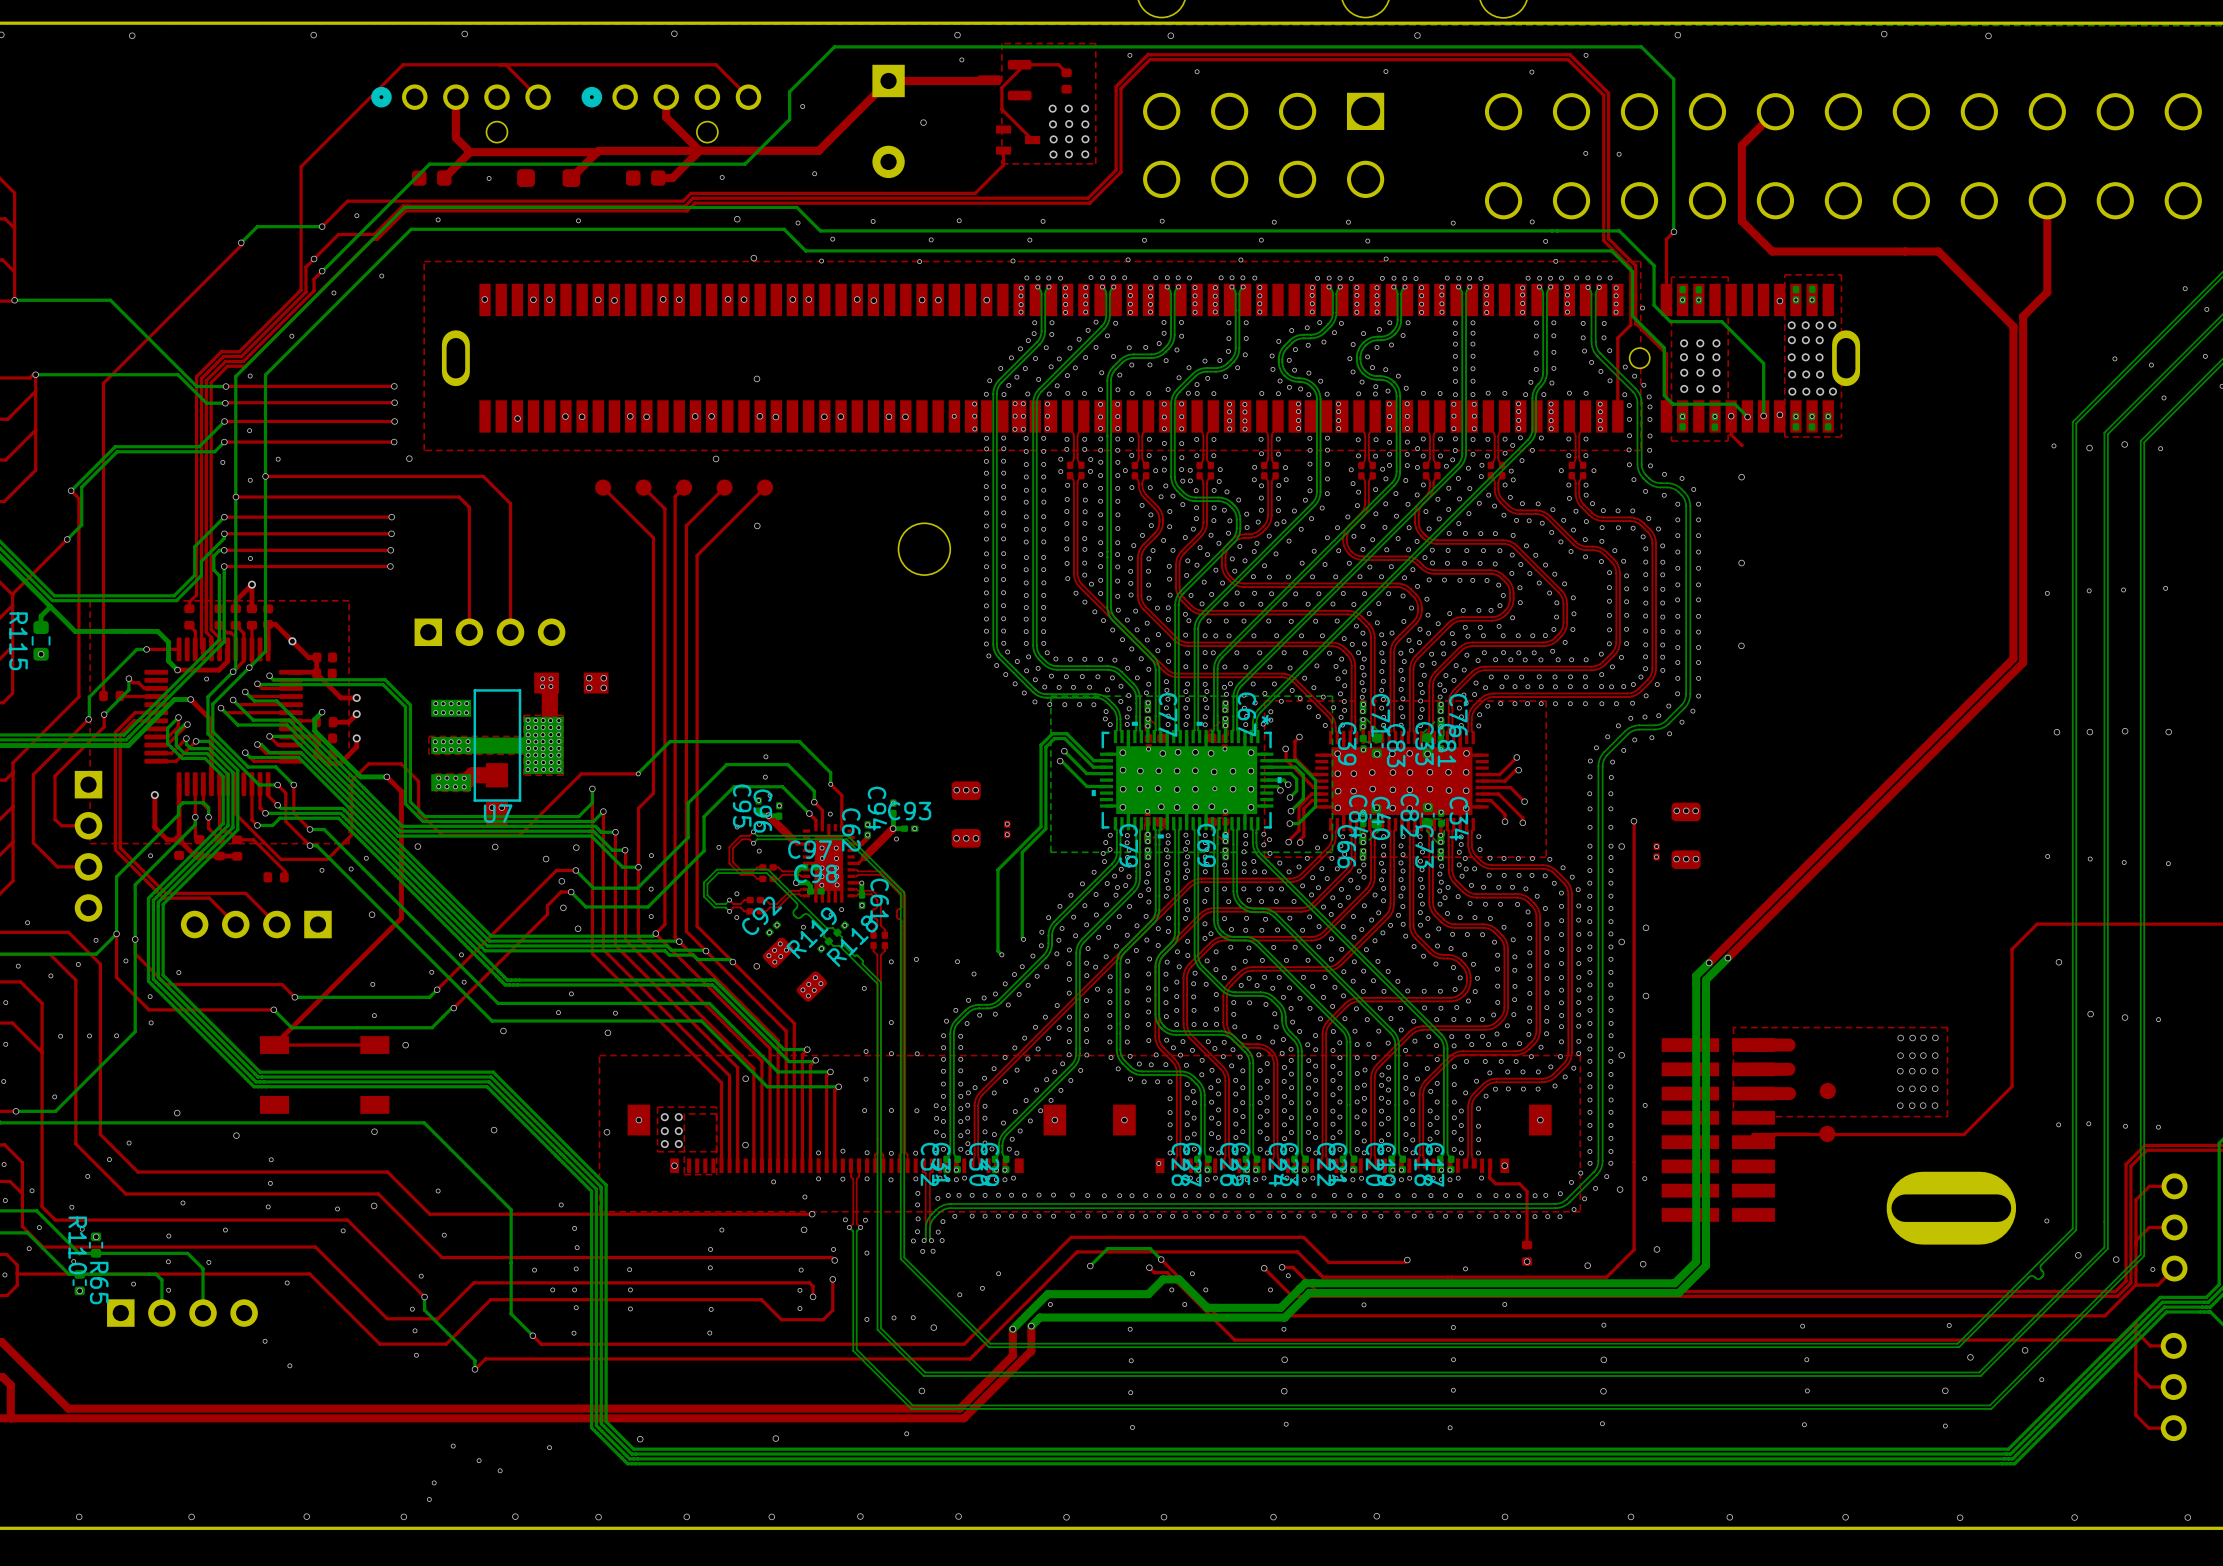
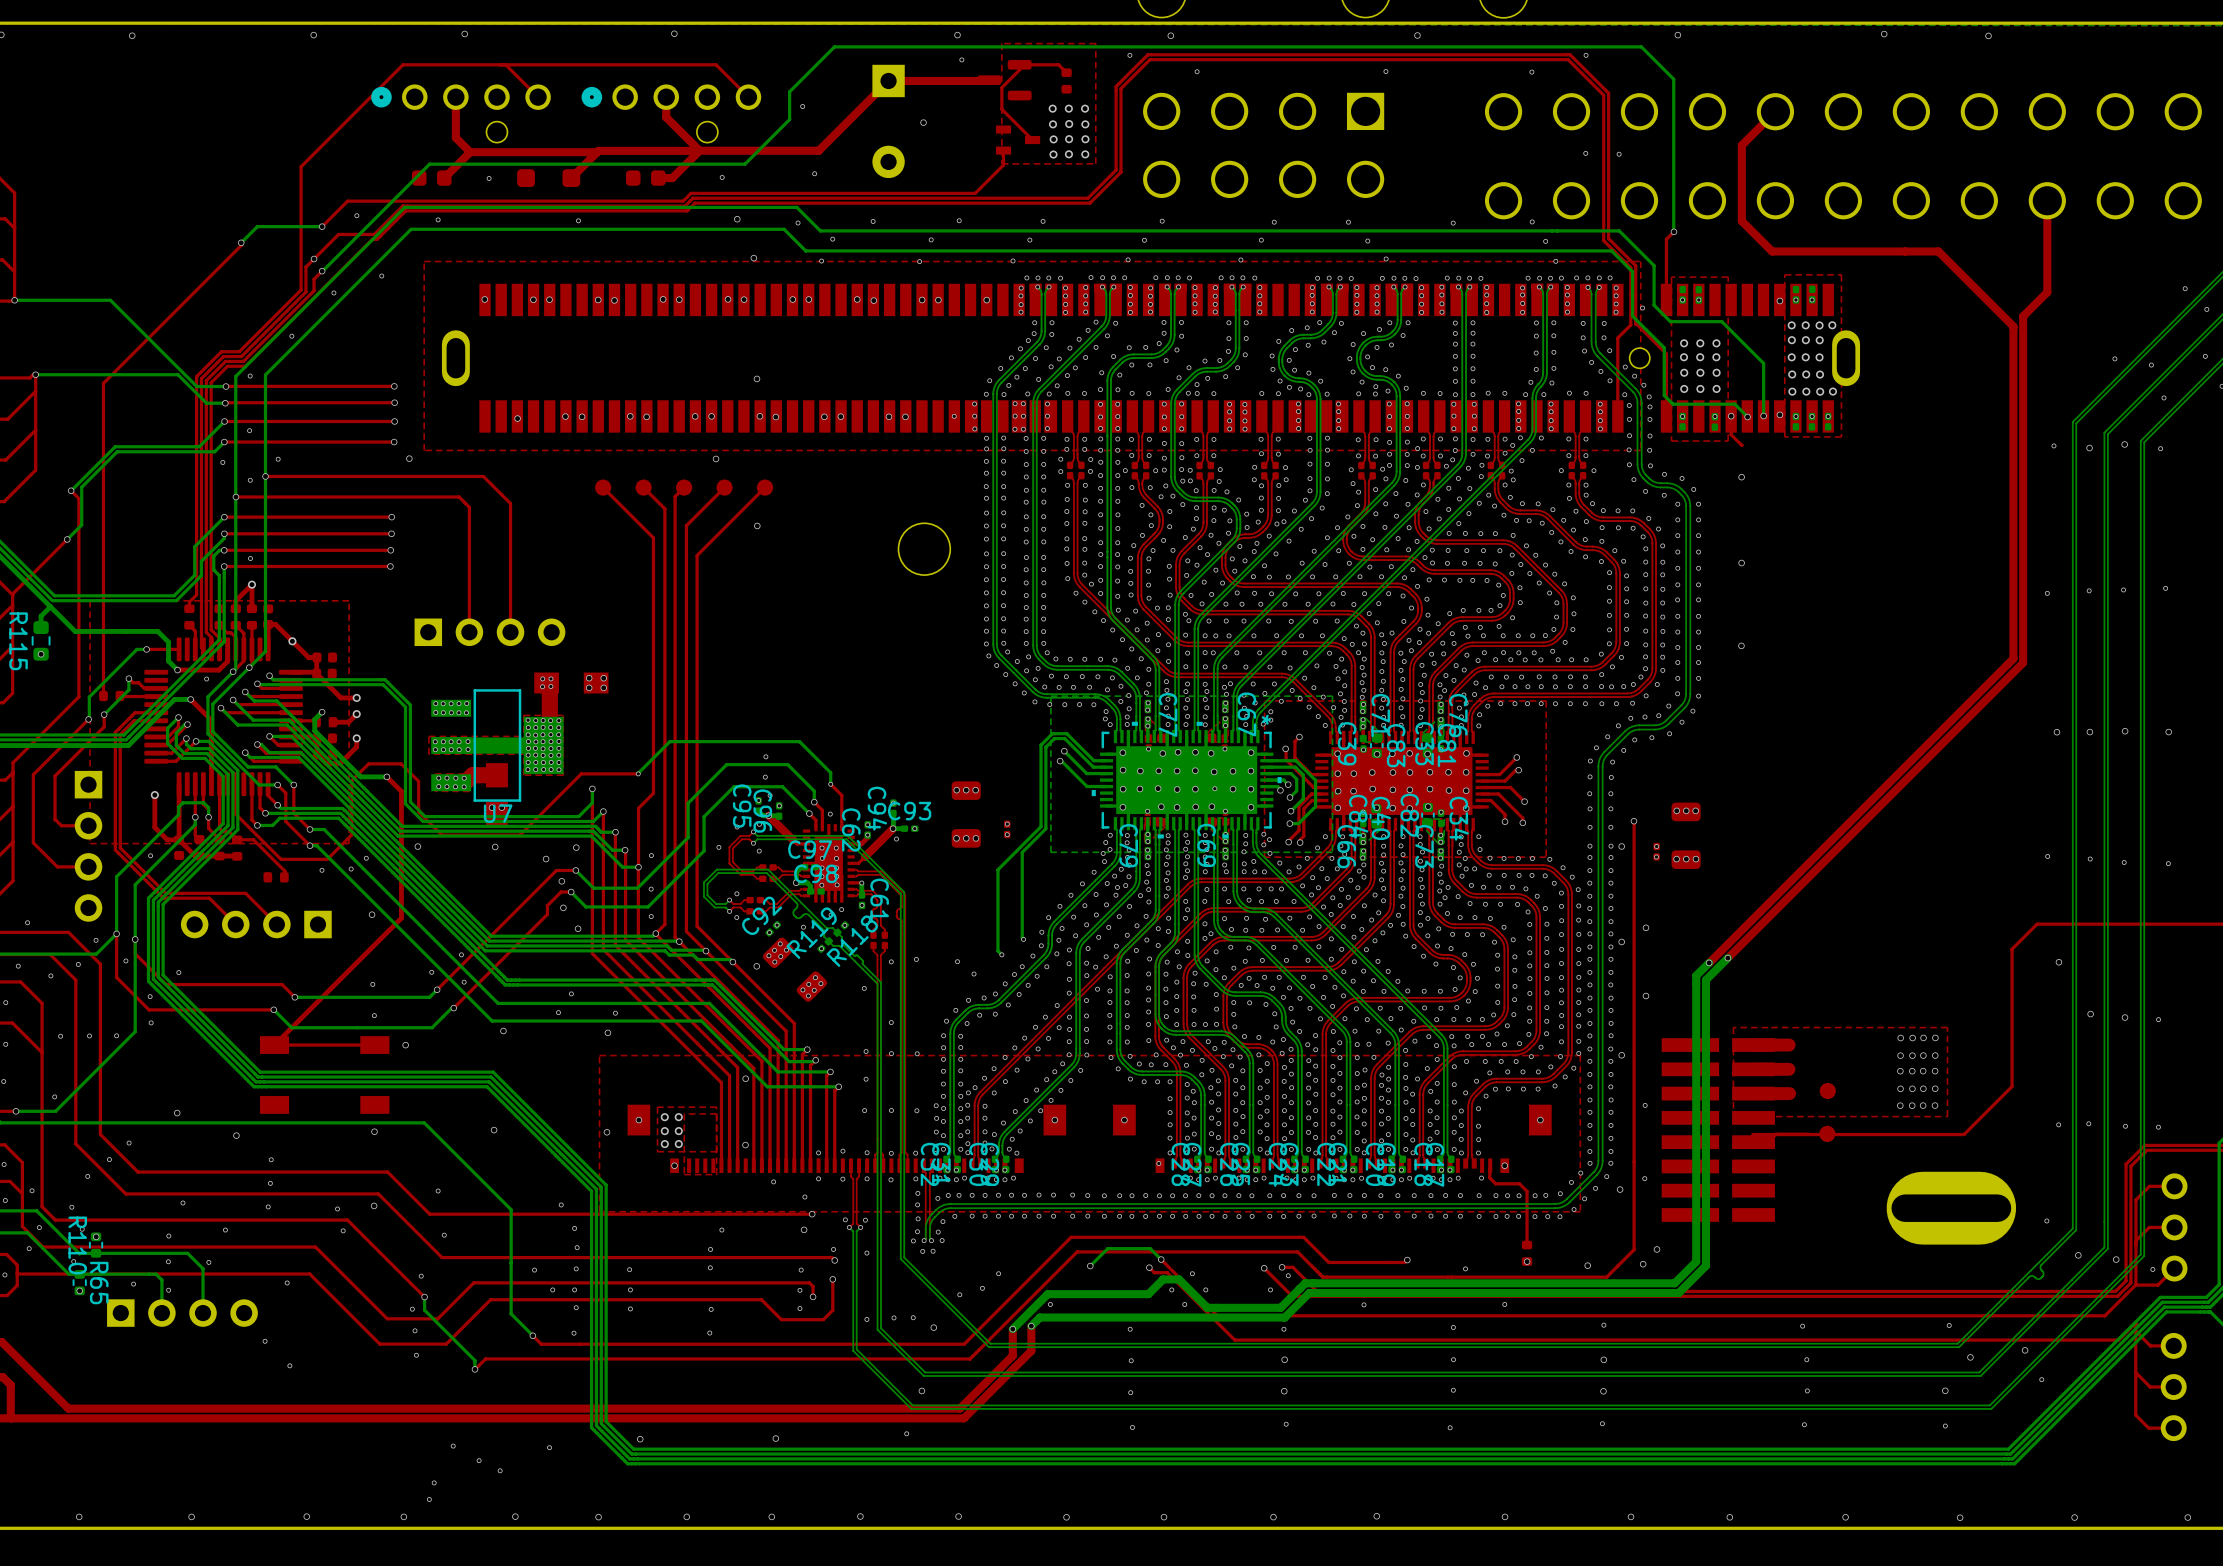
part footprint: [441, 283, 1861, 433] -> [441, 283, 1861, 433]

